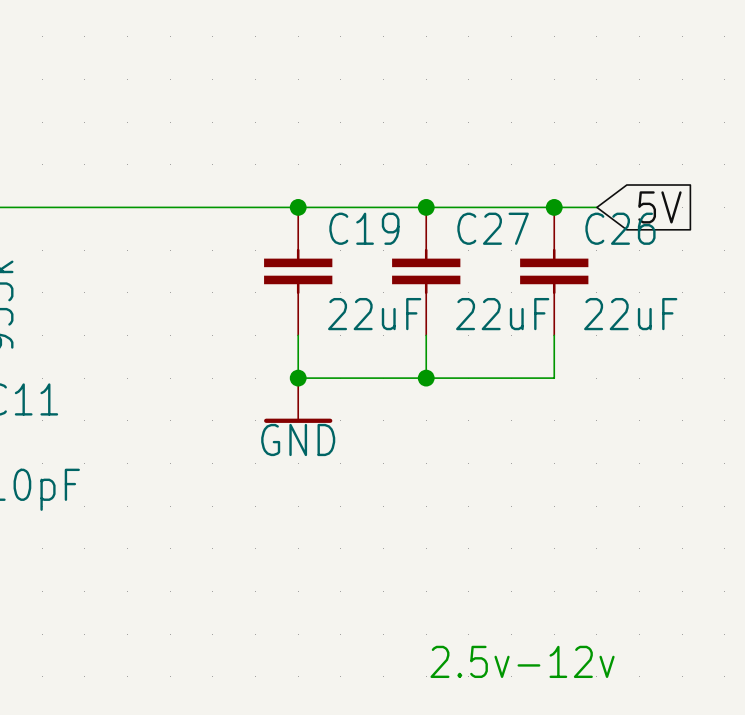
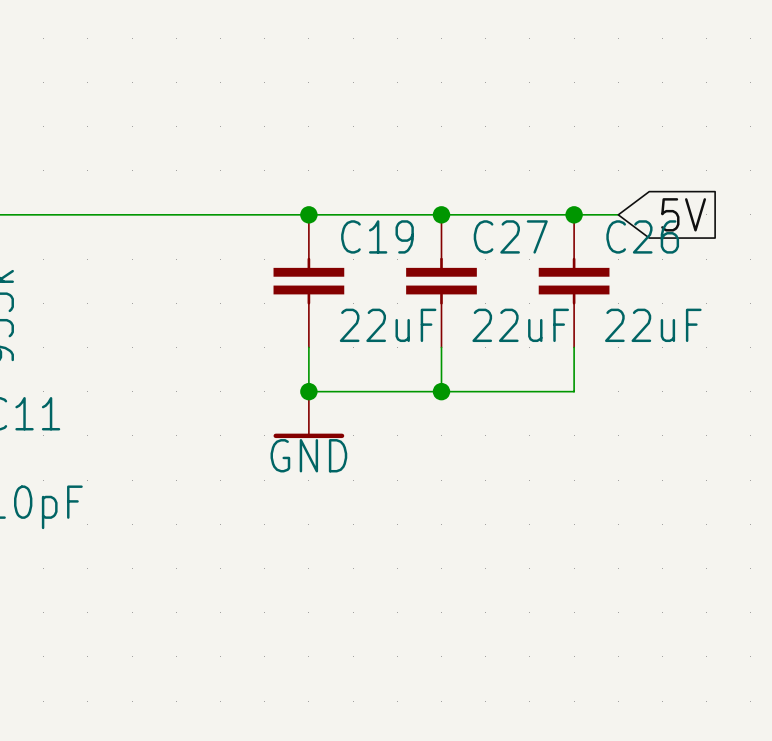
text: 2.5v-12v (522, 661) -> none

